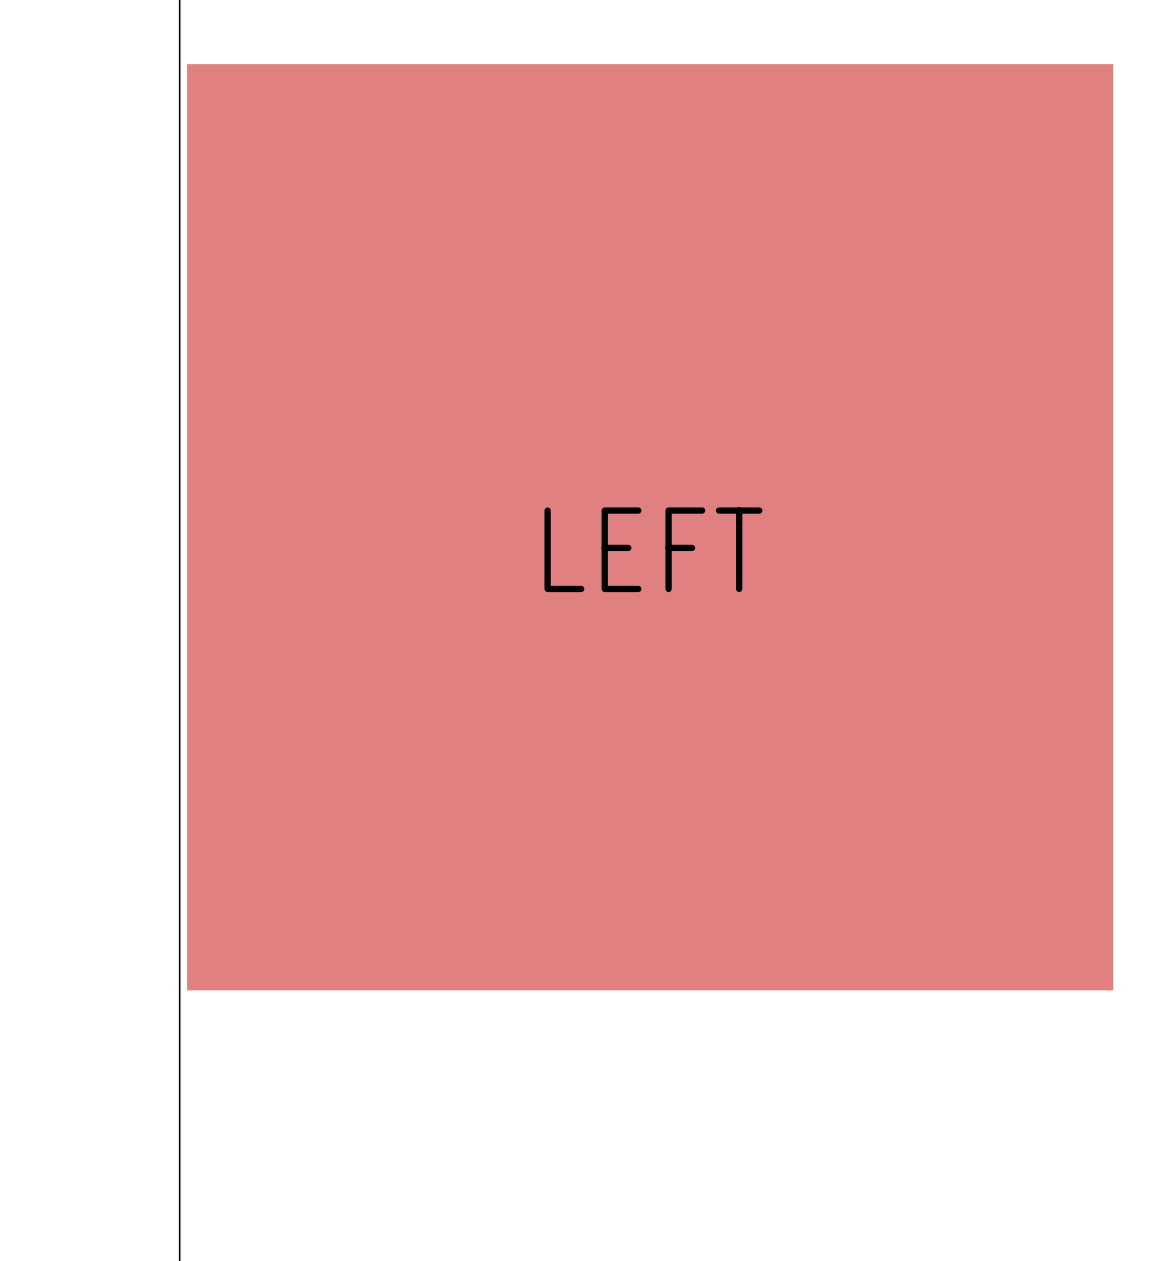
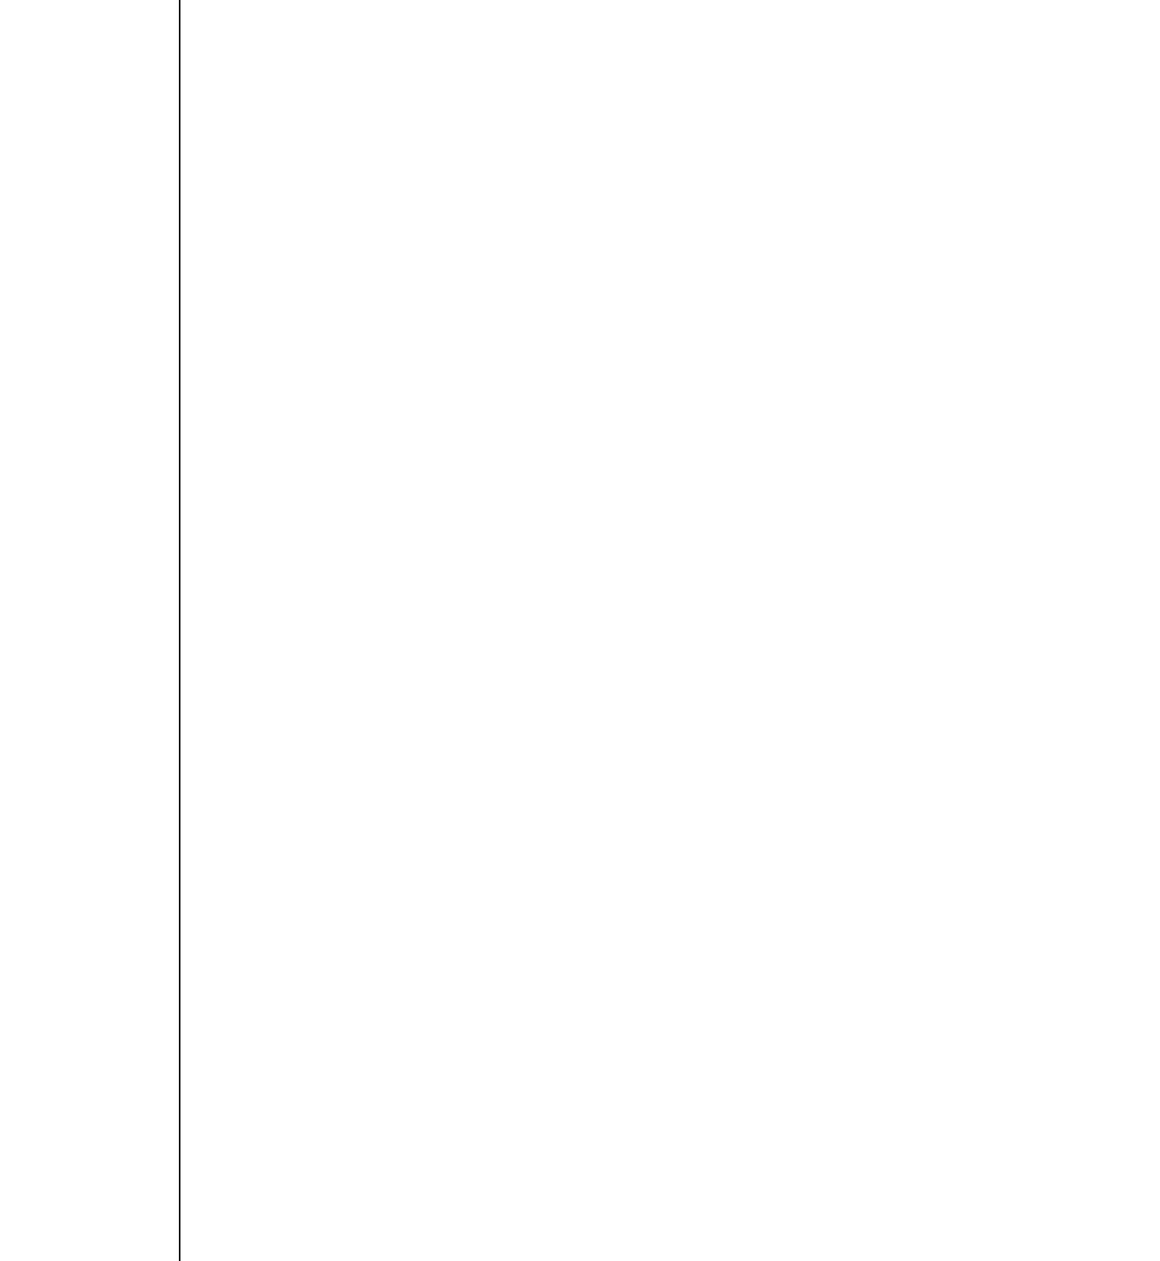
LEFT: (650, 527) -> none

